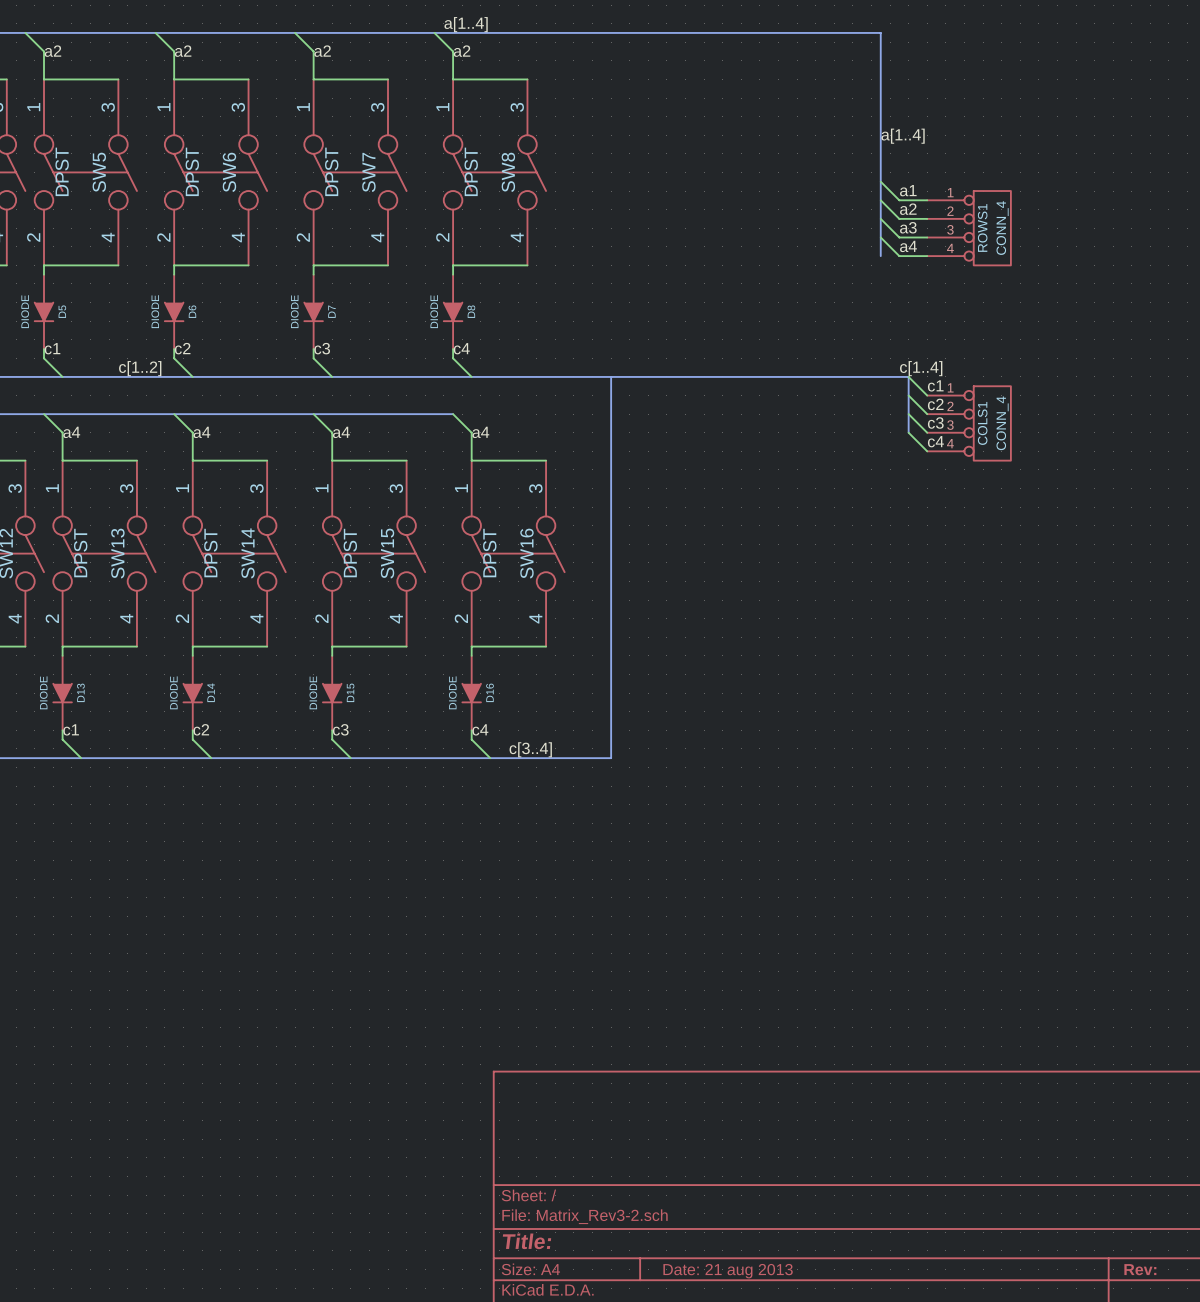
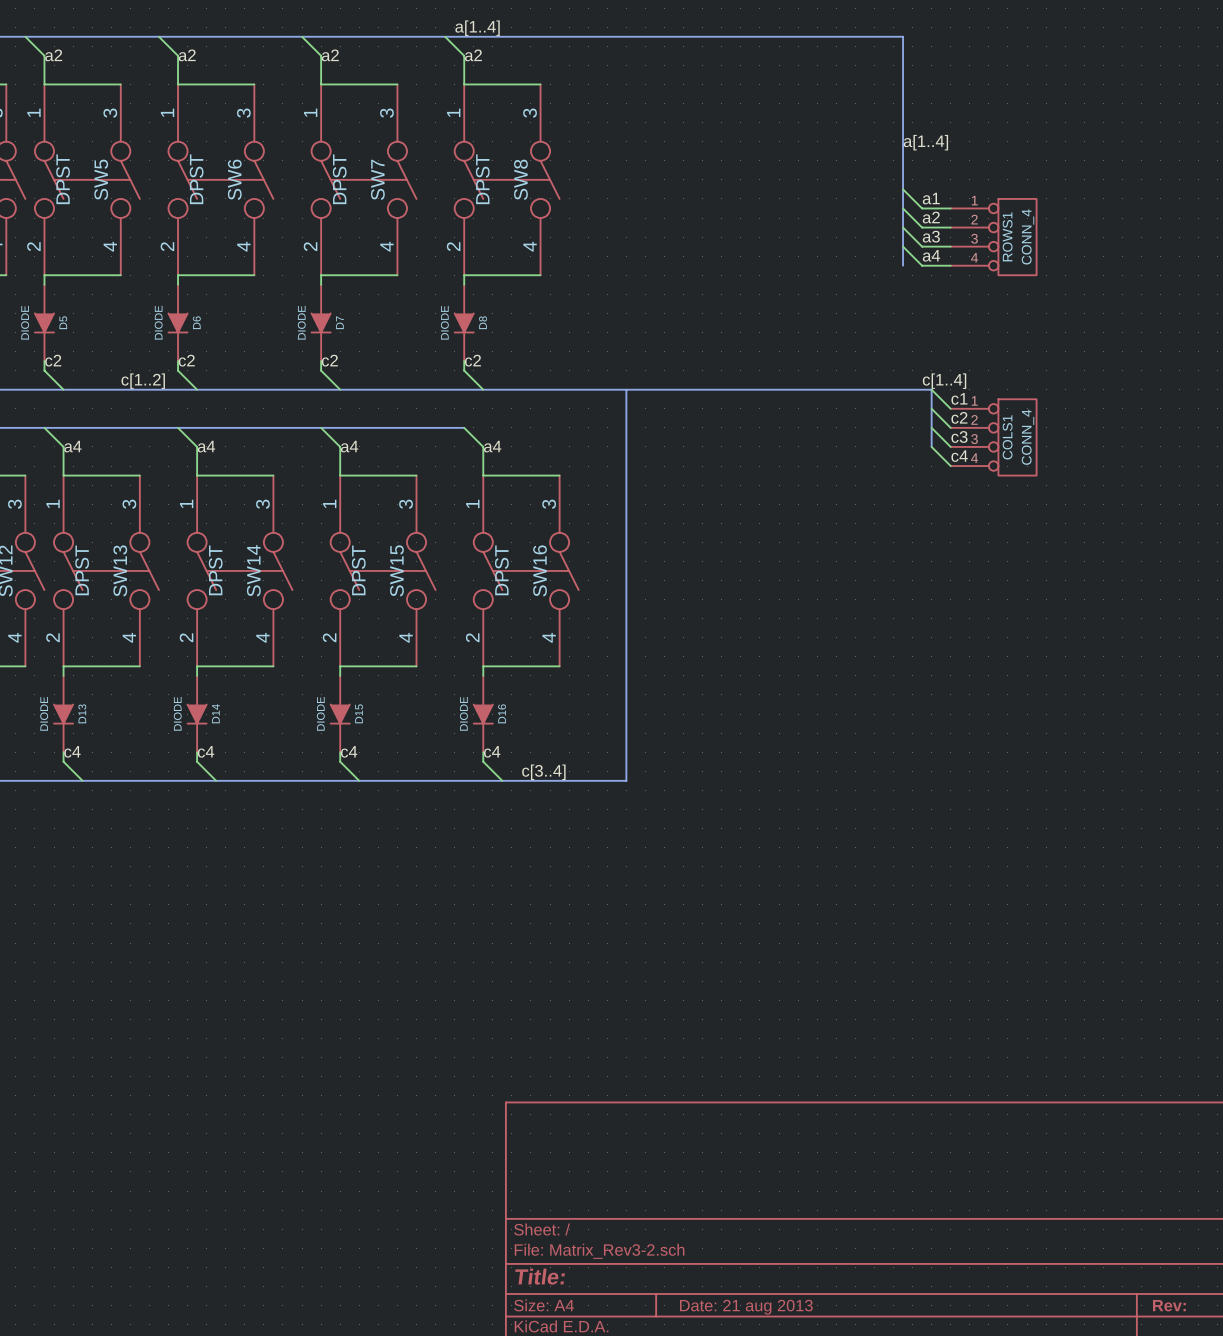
label: c1 (52, 348) -> c2 (53, 360)
label: c3 (322, 348) -> c2 (329, 360)
label: c4 (461, 348) -> c2 (472, 360)
label: c1 (71, 729) -> c4 (72, 751)
label: c2 (201, 729) -> c4 (206, 751)
label: c3 (340, 729) -> c4 (349, 751)

